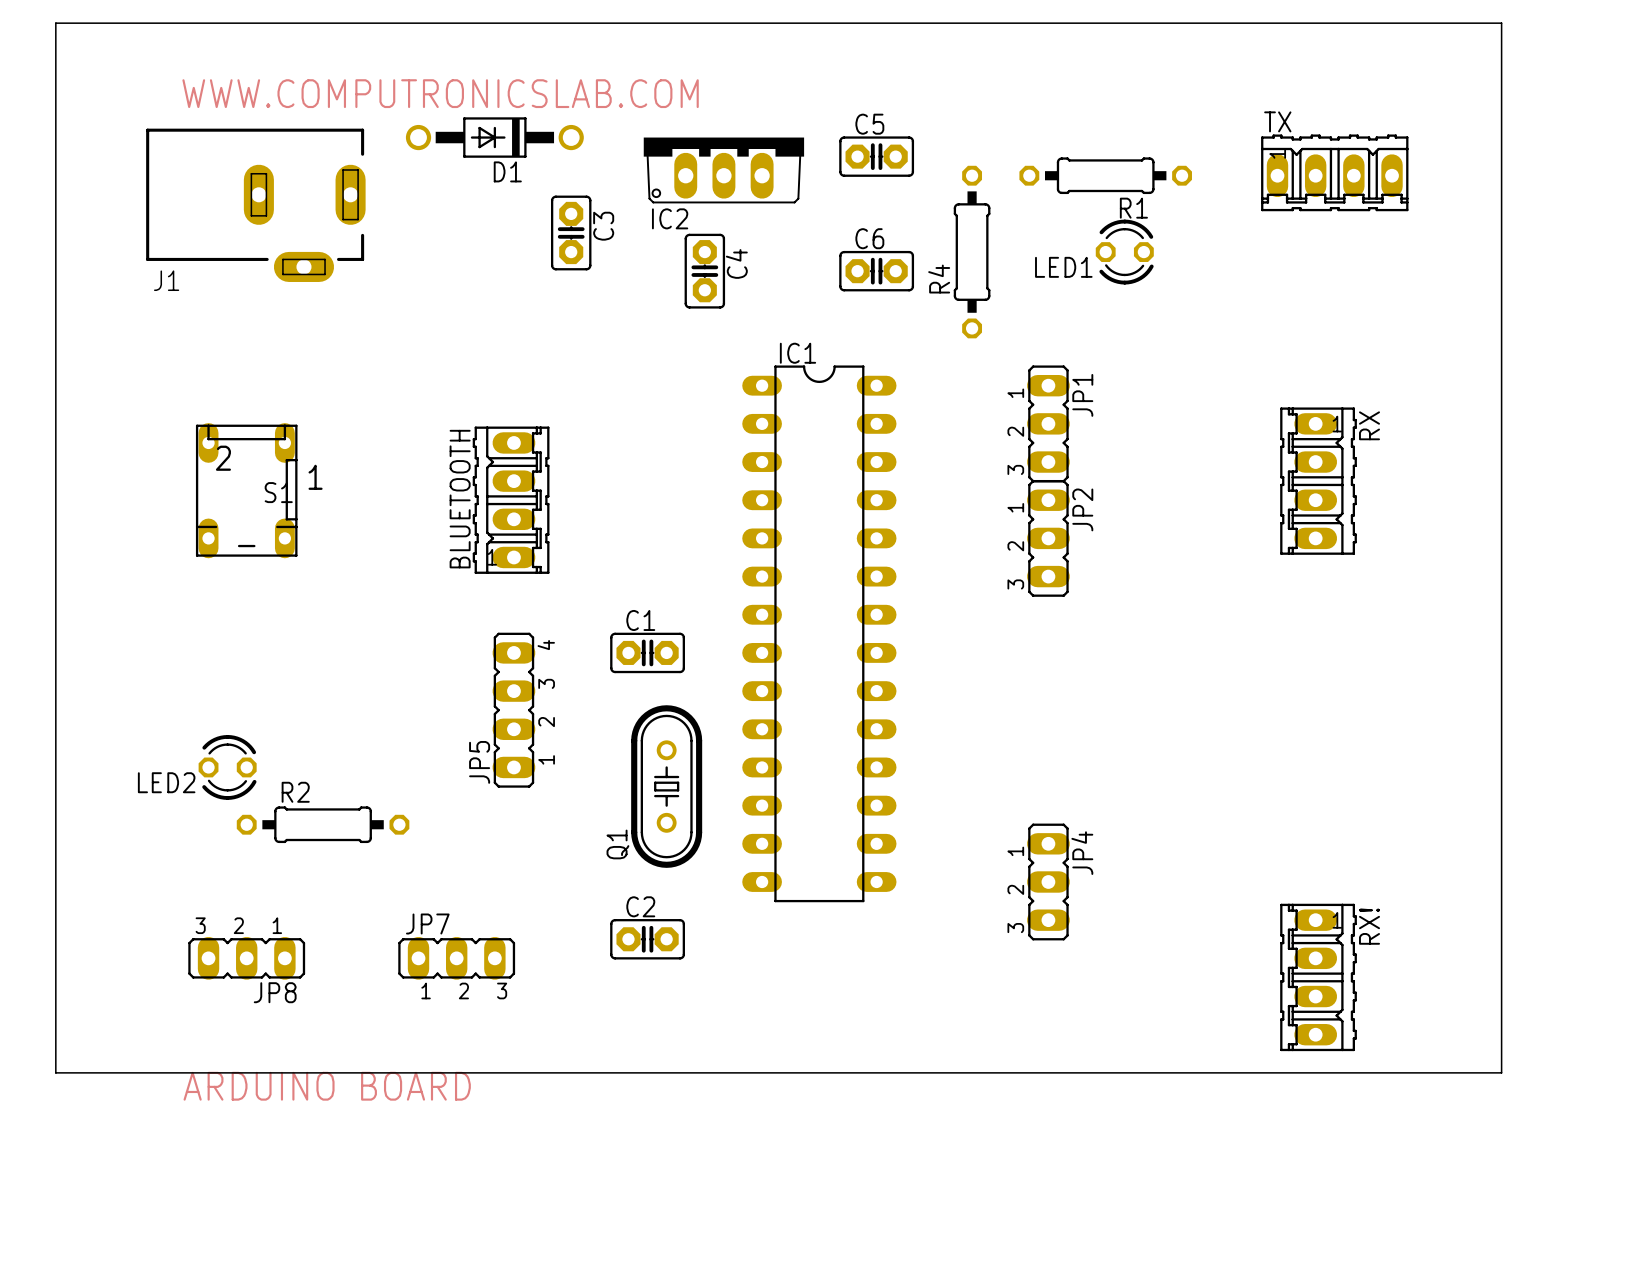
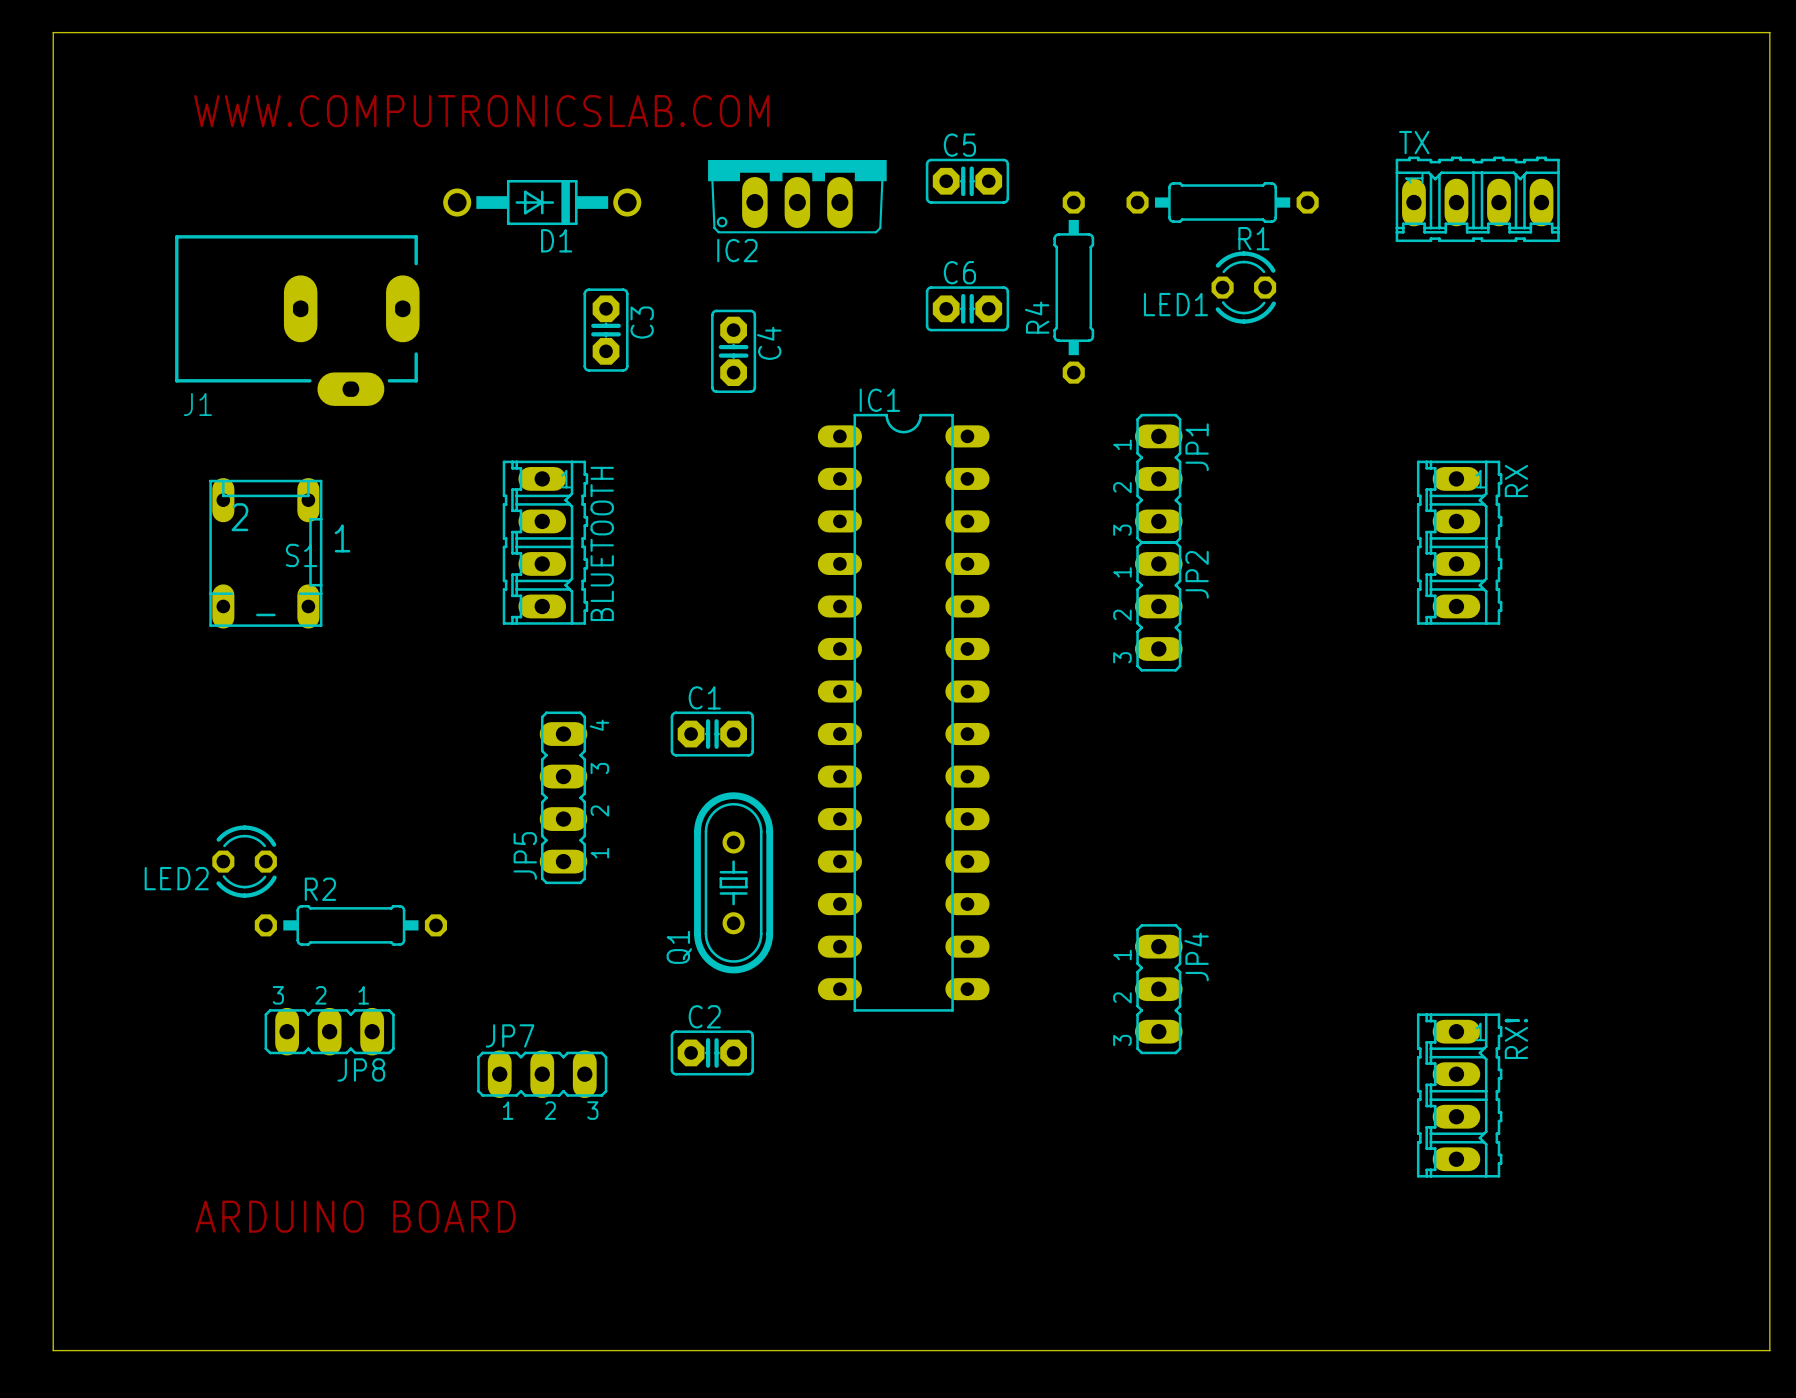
board edge: (1501, 23) (1501, 1072) (55, 1072) -> (1663, 32) (1769, 32) (1769, 1350) (53, 1350) (53, 1201)
D1 position: (494, 137) -> (542, 202)
J1 position: (255, 205) -> (297, 320)
C3 position: (571, 232) -> (606, 330)
C4 position: (704, 271) -> (733, 351)
BLUETOOTH: none -> (545, 542)
BLUETOOTH: (511, 500) -> none
JP8 position: (246, 958) -> (329, 1031)
JP7 position: (456, 958) -> (542, 1074)

